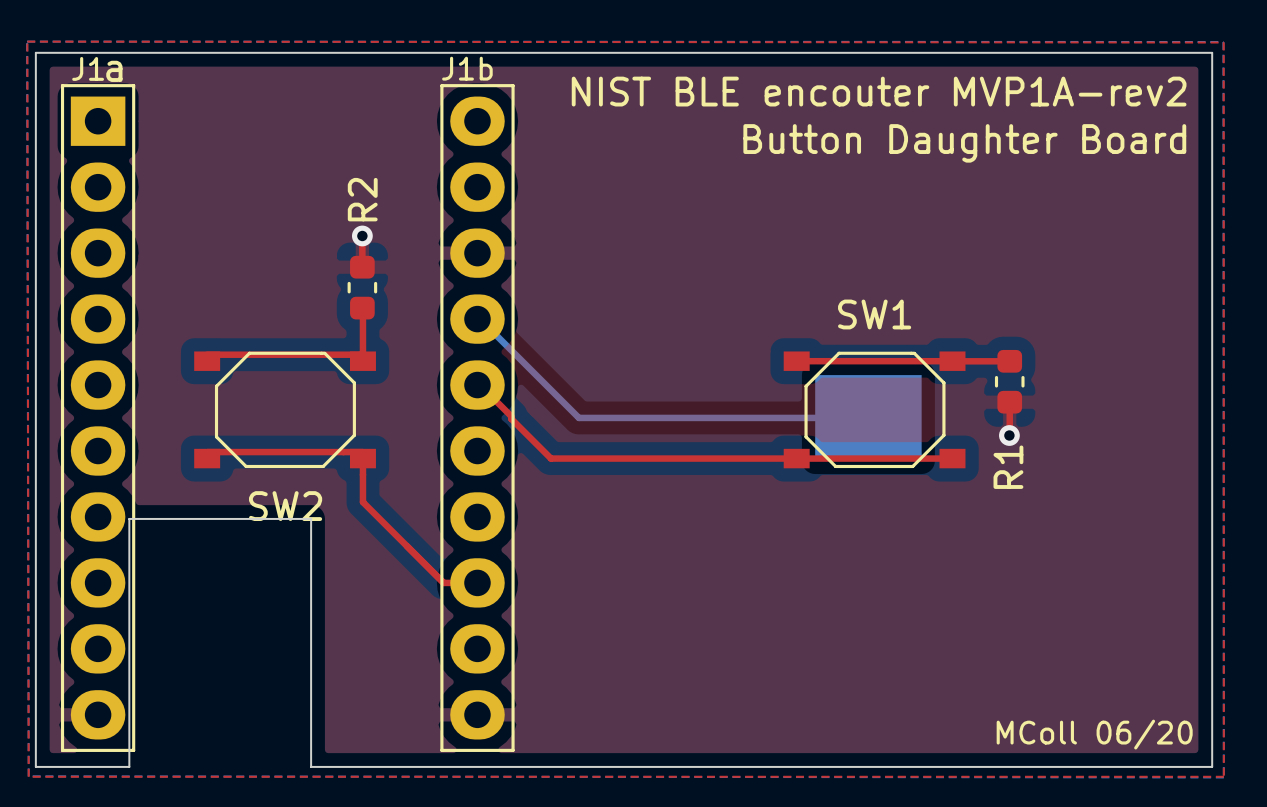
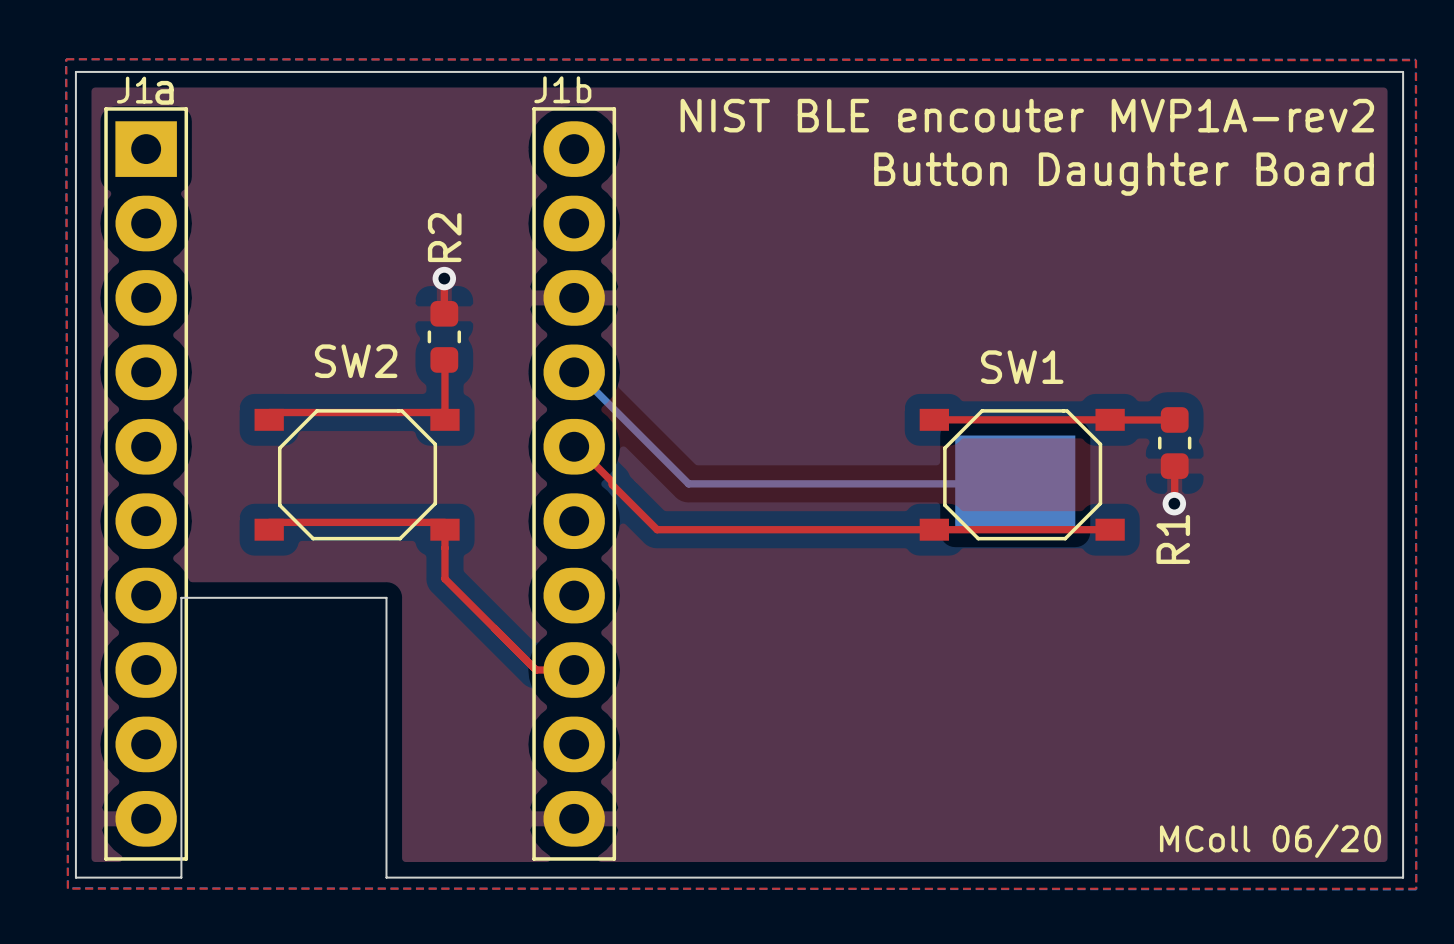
SW2 name position: SW2 (285, 506) -> SW2 (356, 361)

